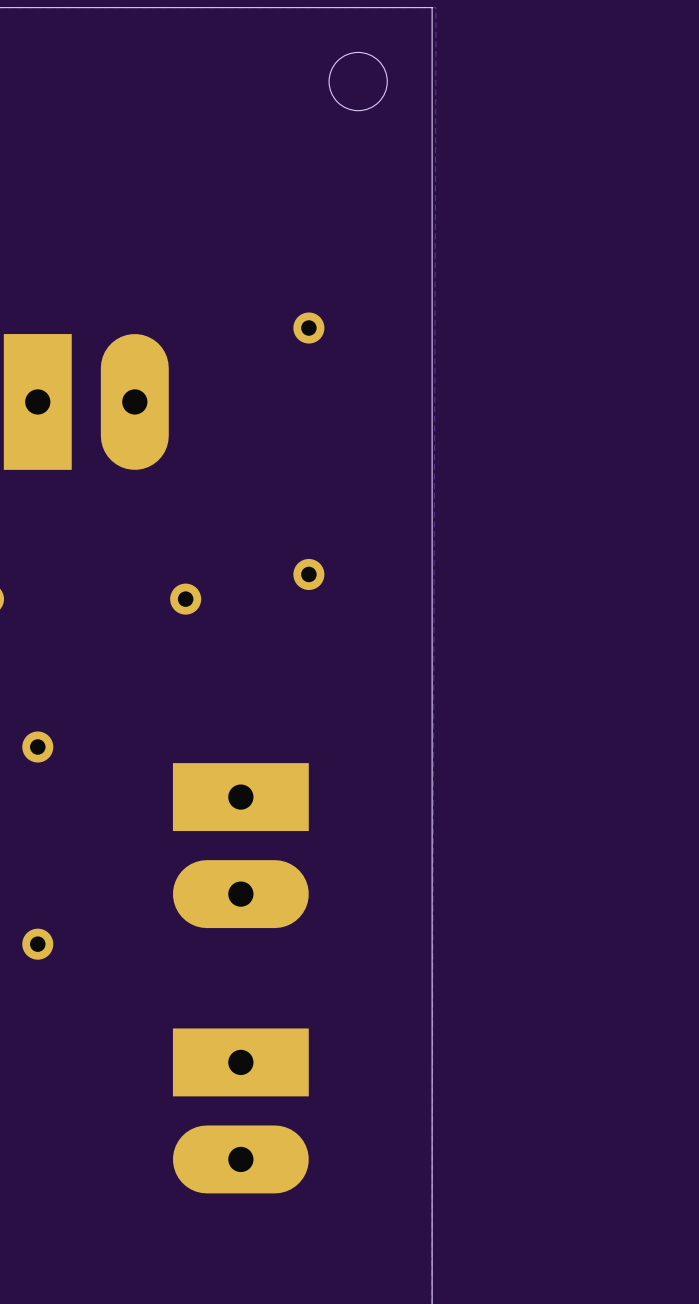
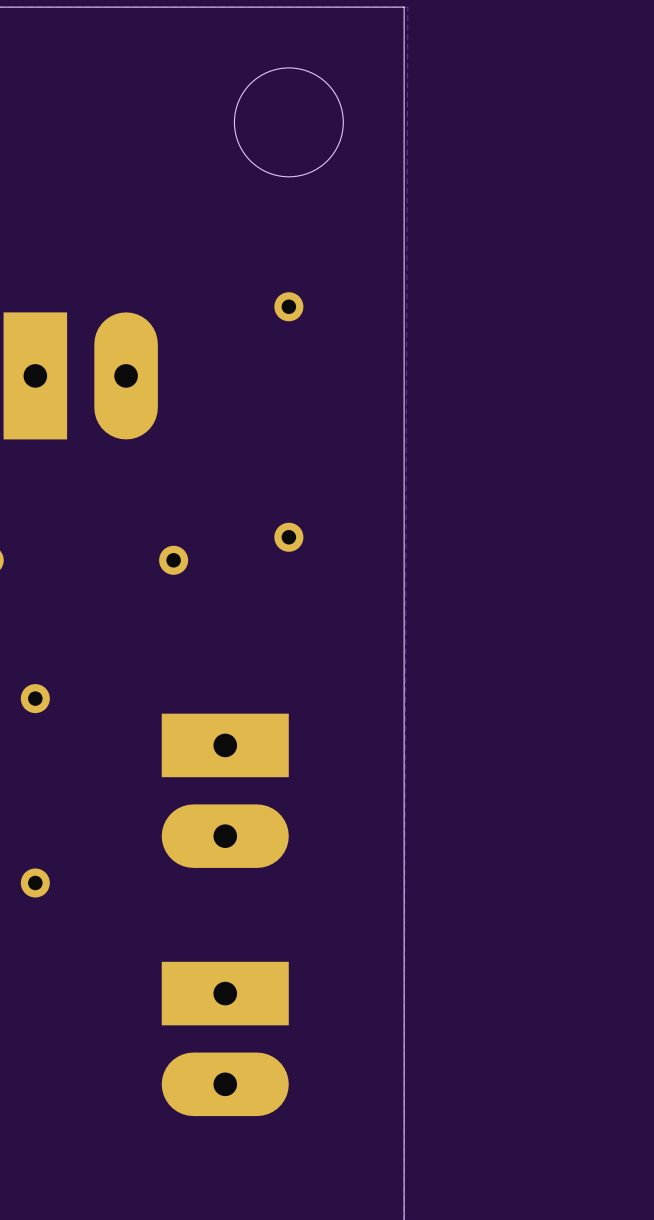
round board edge: [328, 51, 388, 112] -> none
round board edge: none -> [233, 67, 344, 178]

